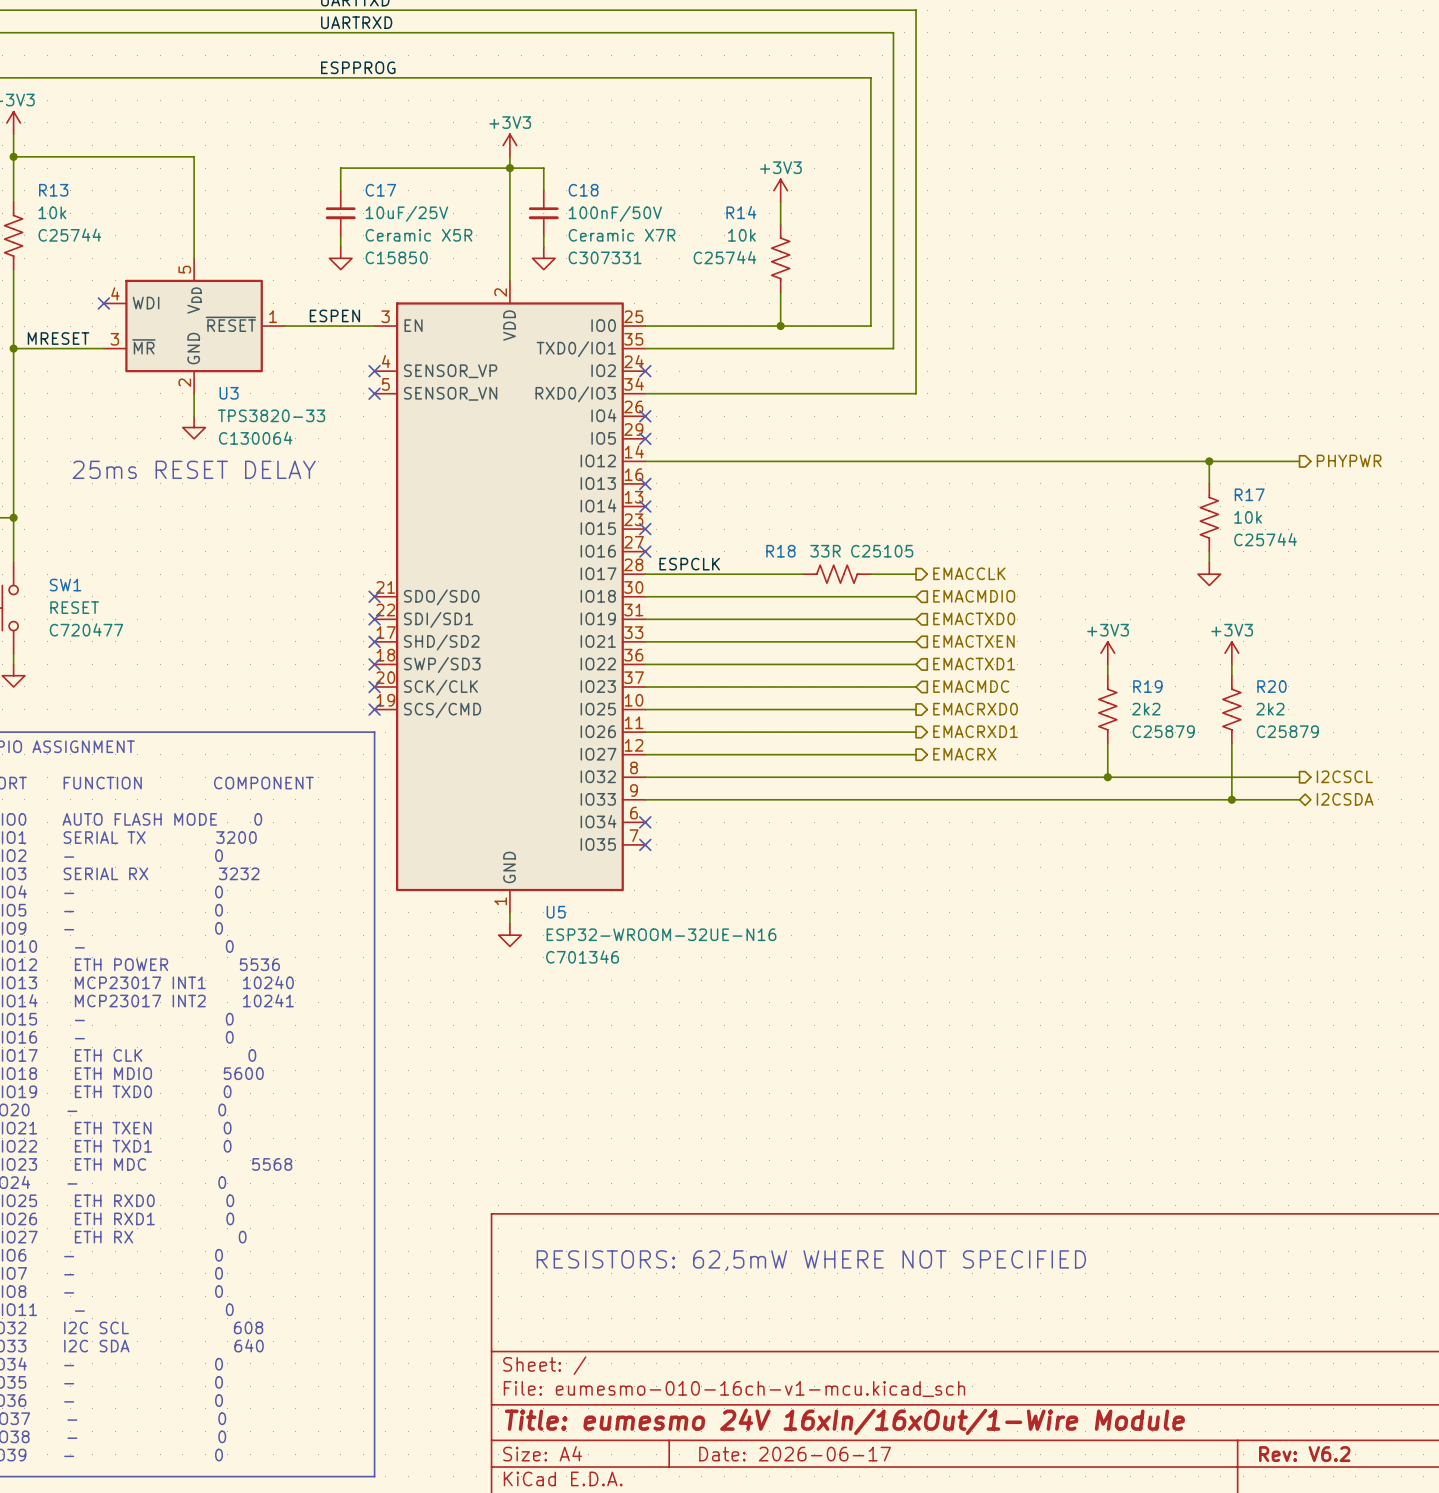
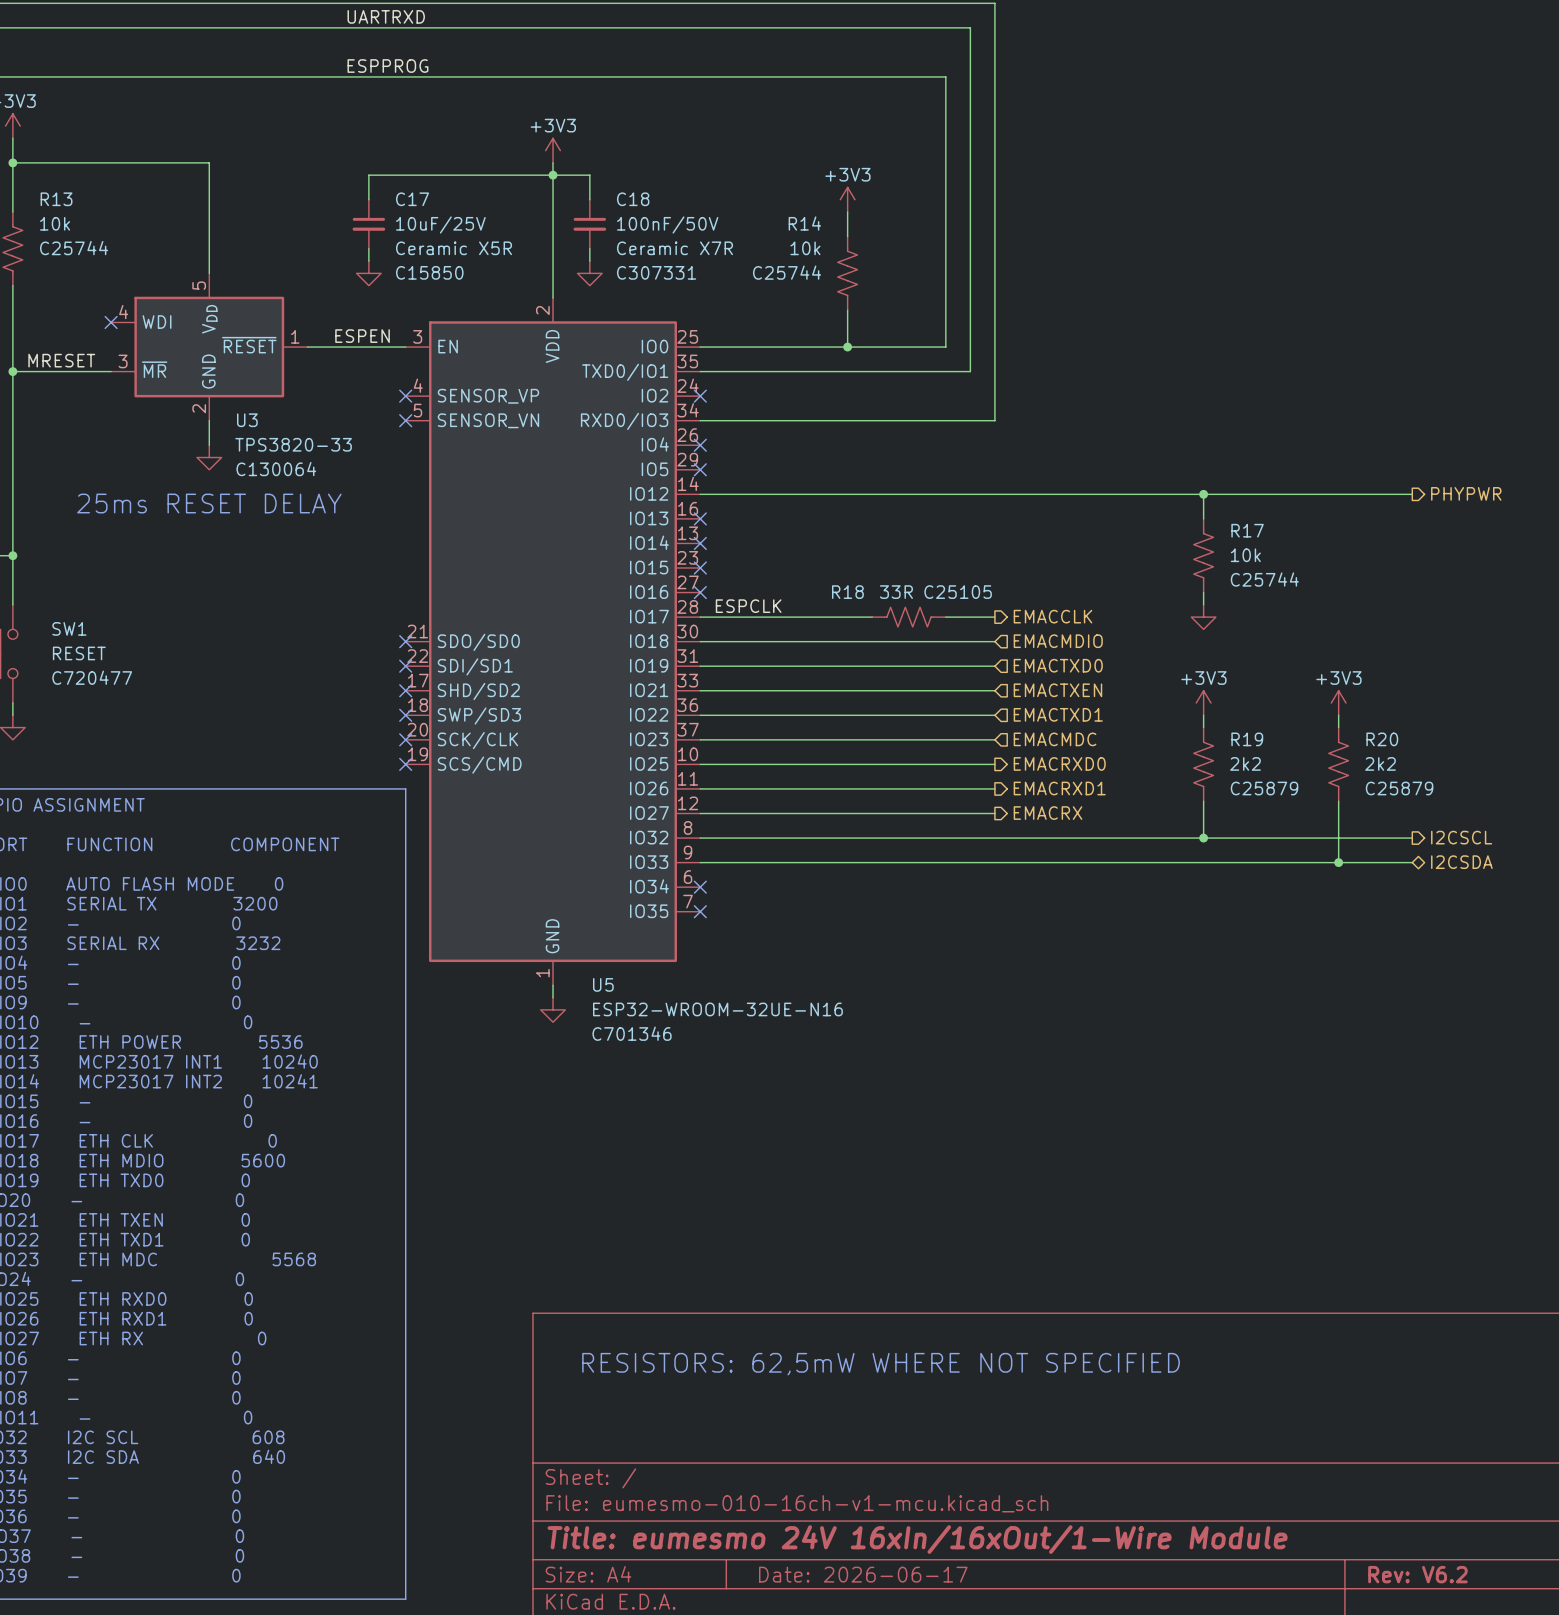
junction: none -> (1203, 494)
wire: (1209, 461) (1209, 483) -> (1203, 494) (1203, 518)
junction: (1209, 461) -> none
R17 position: (1209, 517) -> (1203, 555)
wire: (1209, 551) (1209, 562) -> (1203, 592) (1203, 604)
power symbol position: (1209, 574) -> (1203, 617)

